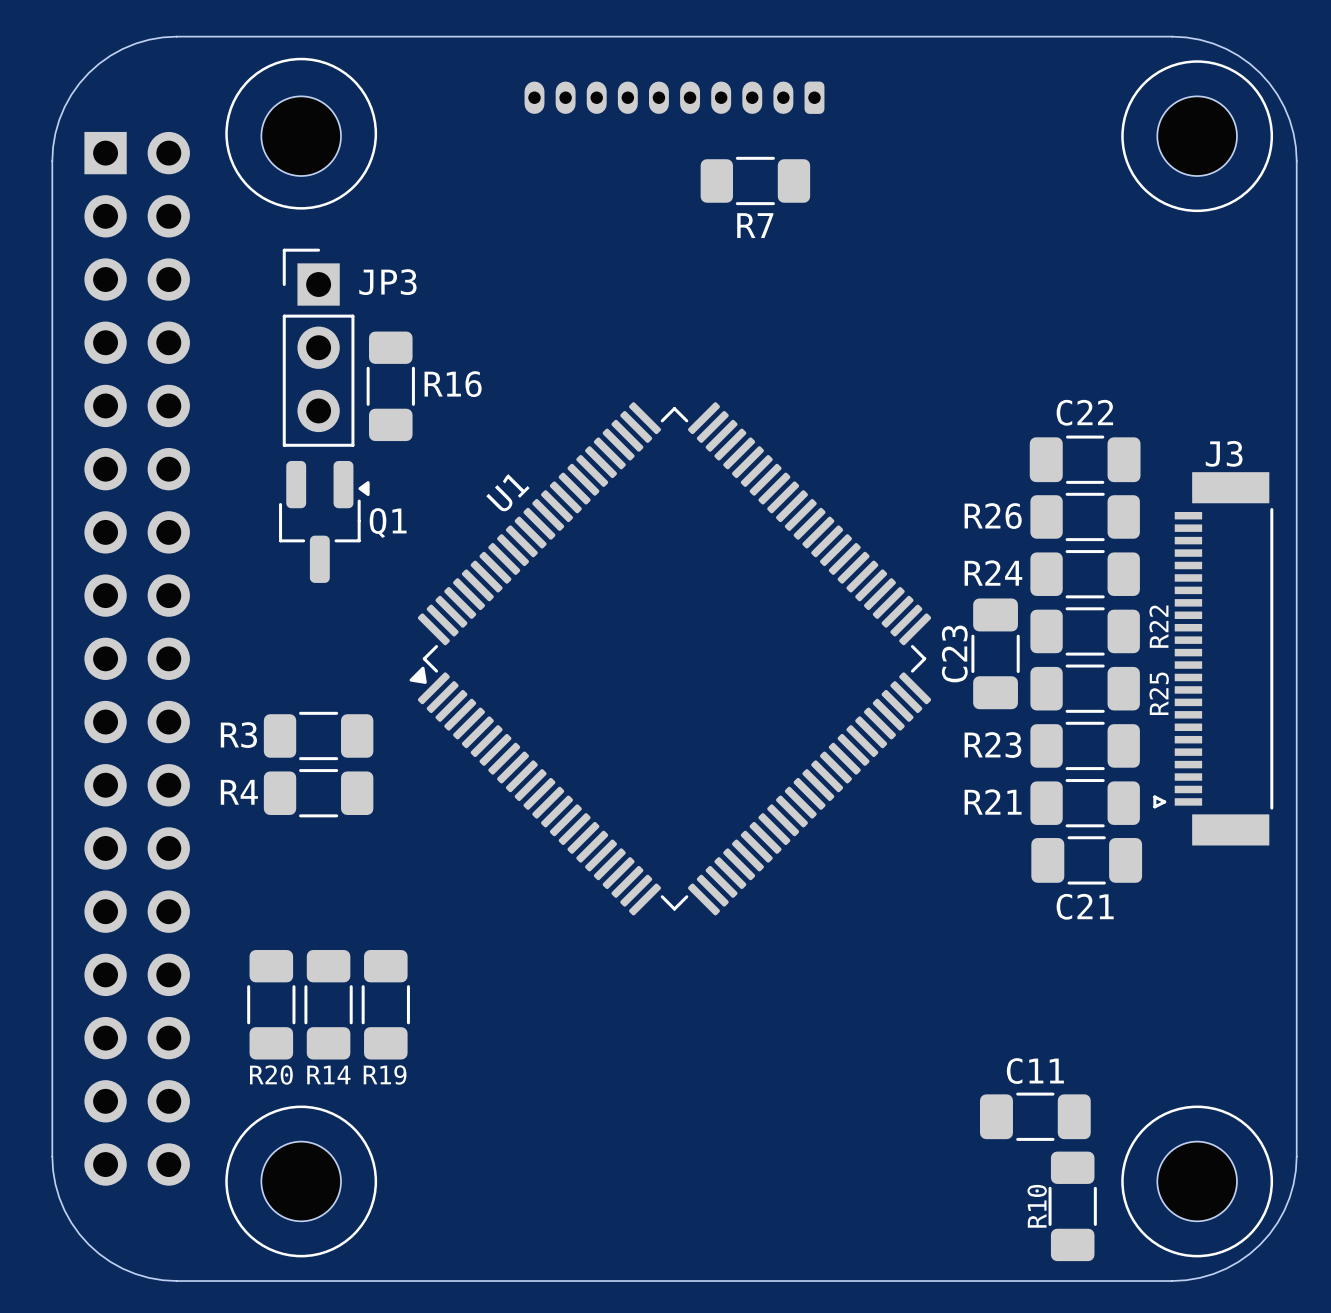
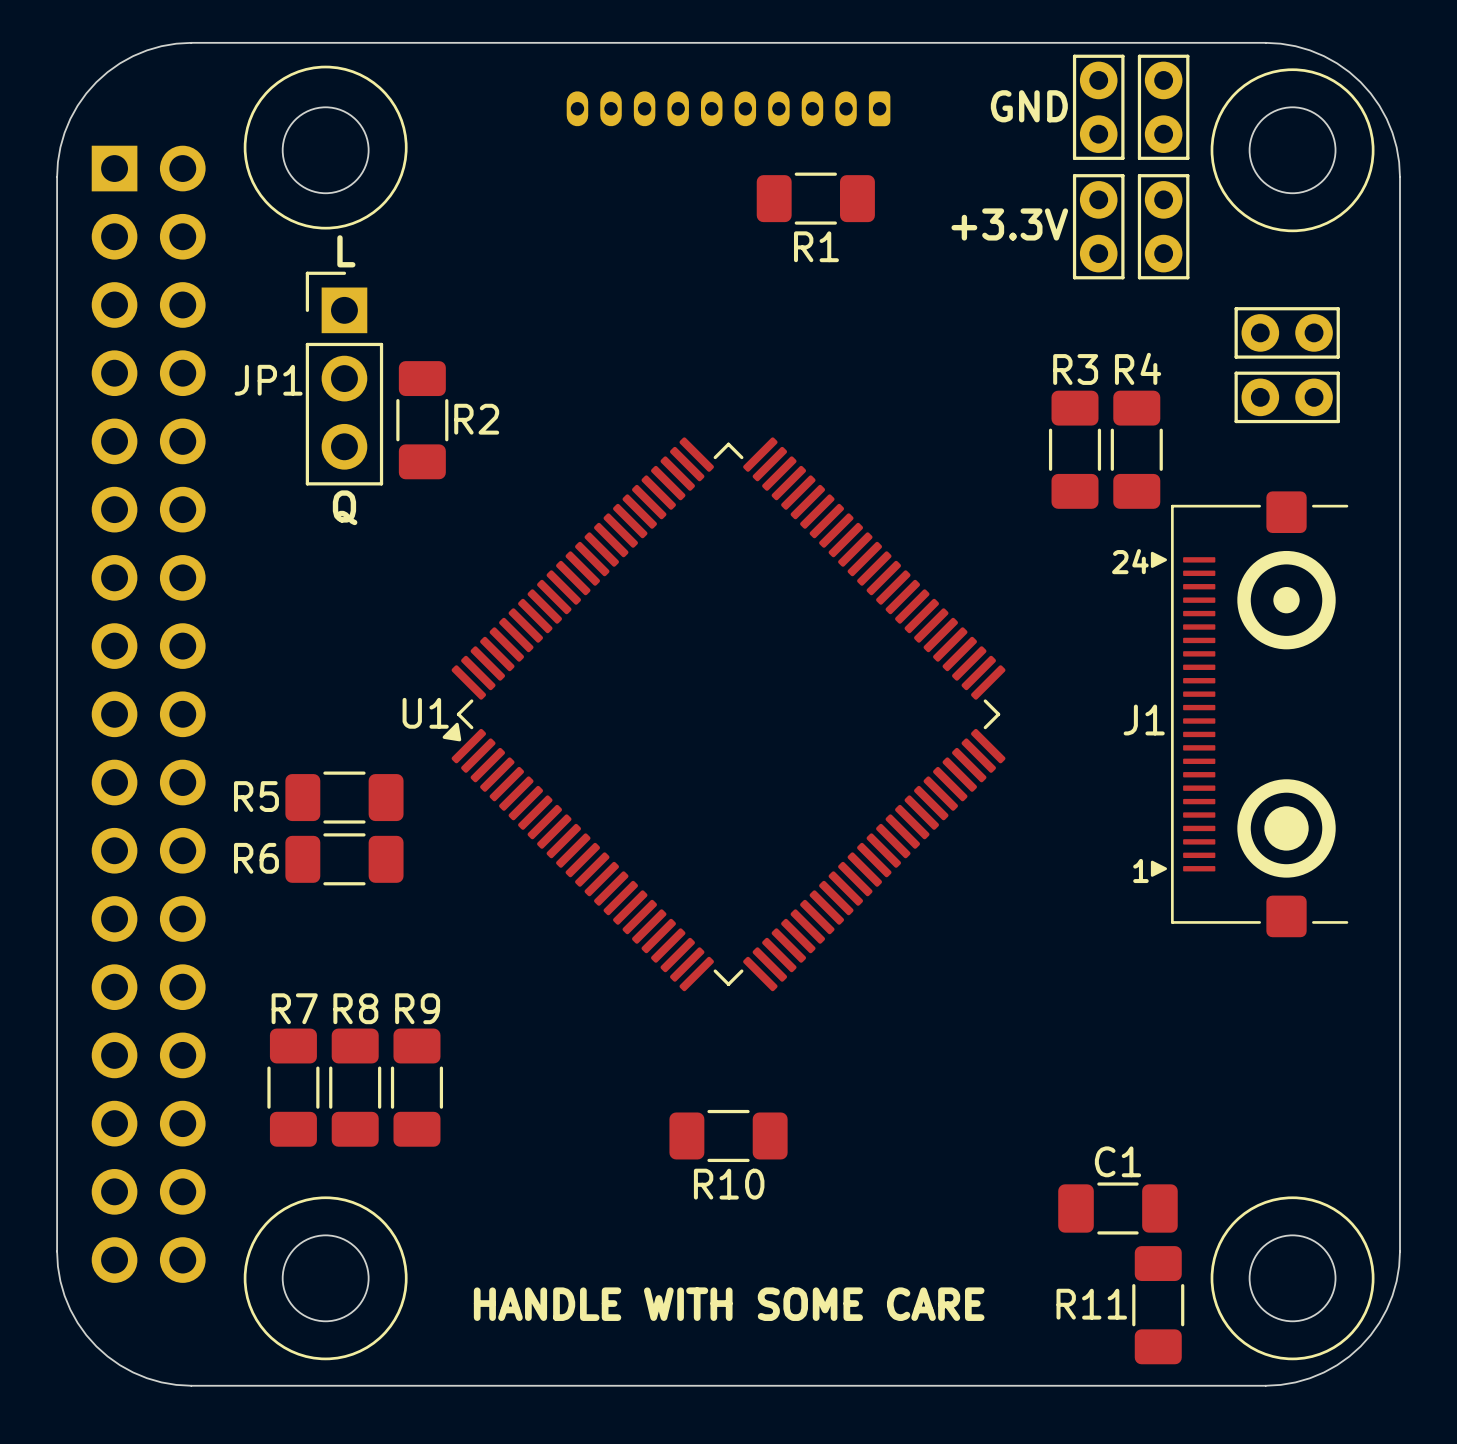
text: none -> GND (1029, 106)
part: none -> (1098, 107)
part: none -> (1163, 107)
text: none -> +3.3V (1009, 224)
part: none -> (1098, 226)
part: none -> (1163, 226)
R7 name: R7 (755, 225) -> R1 (816, 246)
text: none -> L (346, 251)
JP3 name: JP3 (387, 282) -> JP1 (268, 380)
part: none -> (1287, 332)
part: none -> (1287, 397)
R16 name: R16 (453, 384) -> R2 (476, 419)
R3: none -> (1075, 449)
R4: none -> (1136, 449)
C22: (1085, 459) -> none
text: none -> Q (345, 507)
U1 name rotation: 0° (507, 492) -> 45° clockwise (425, 713)
U1 name position: U1 (507, 492) -> U1 (425, 713)
R26: (1085, 516) -> none
Q1: (324, 521) -> none
R24: (1085, 574) -> none
R22: (1085, 631) -> none
C23: (995, 653) -> none
J1: none -> (1249, 714)
J3: (1213, 658) -> none
R25: (1085, 688) -> none
R3 name: R3 (238, 735) -> R5 (256, 796)
R23: (1085, 745) -> none
R4 name: R4 (239, 792) -> R6 (256, 858)
R21: (1085, 803) -> none
C21: (1086, 860) -> none
R10: none -> (728, 1135)
C11 name: C11 (1035, 1071) -> C1 (1117, 1161)
R14 name: R14 (328, 1074) -> R8 (355, 1008)
R20 name: R20 (271, 1075) -> R7 (294, 1008)
R19 name: R19 (385, 1075) -> R9 (417, 1008)
text: none -> HANDLE WITH SOME CARE (729, 1304)
R10 name: R10 (1037, 1206) -> R11 (1091, 1304)

